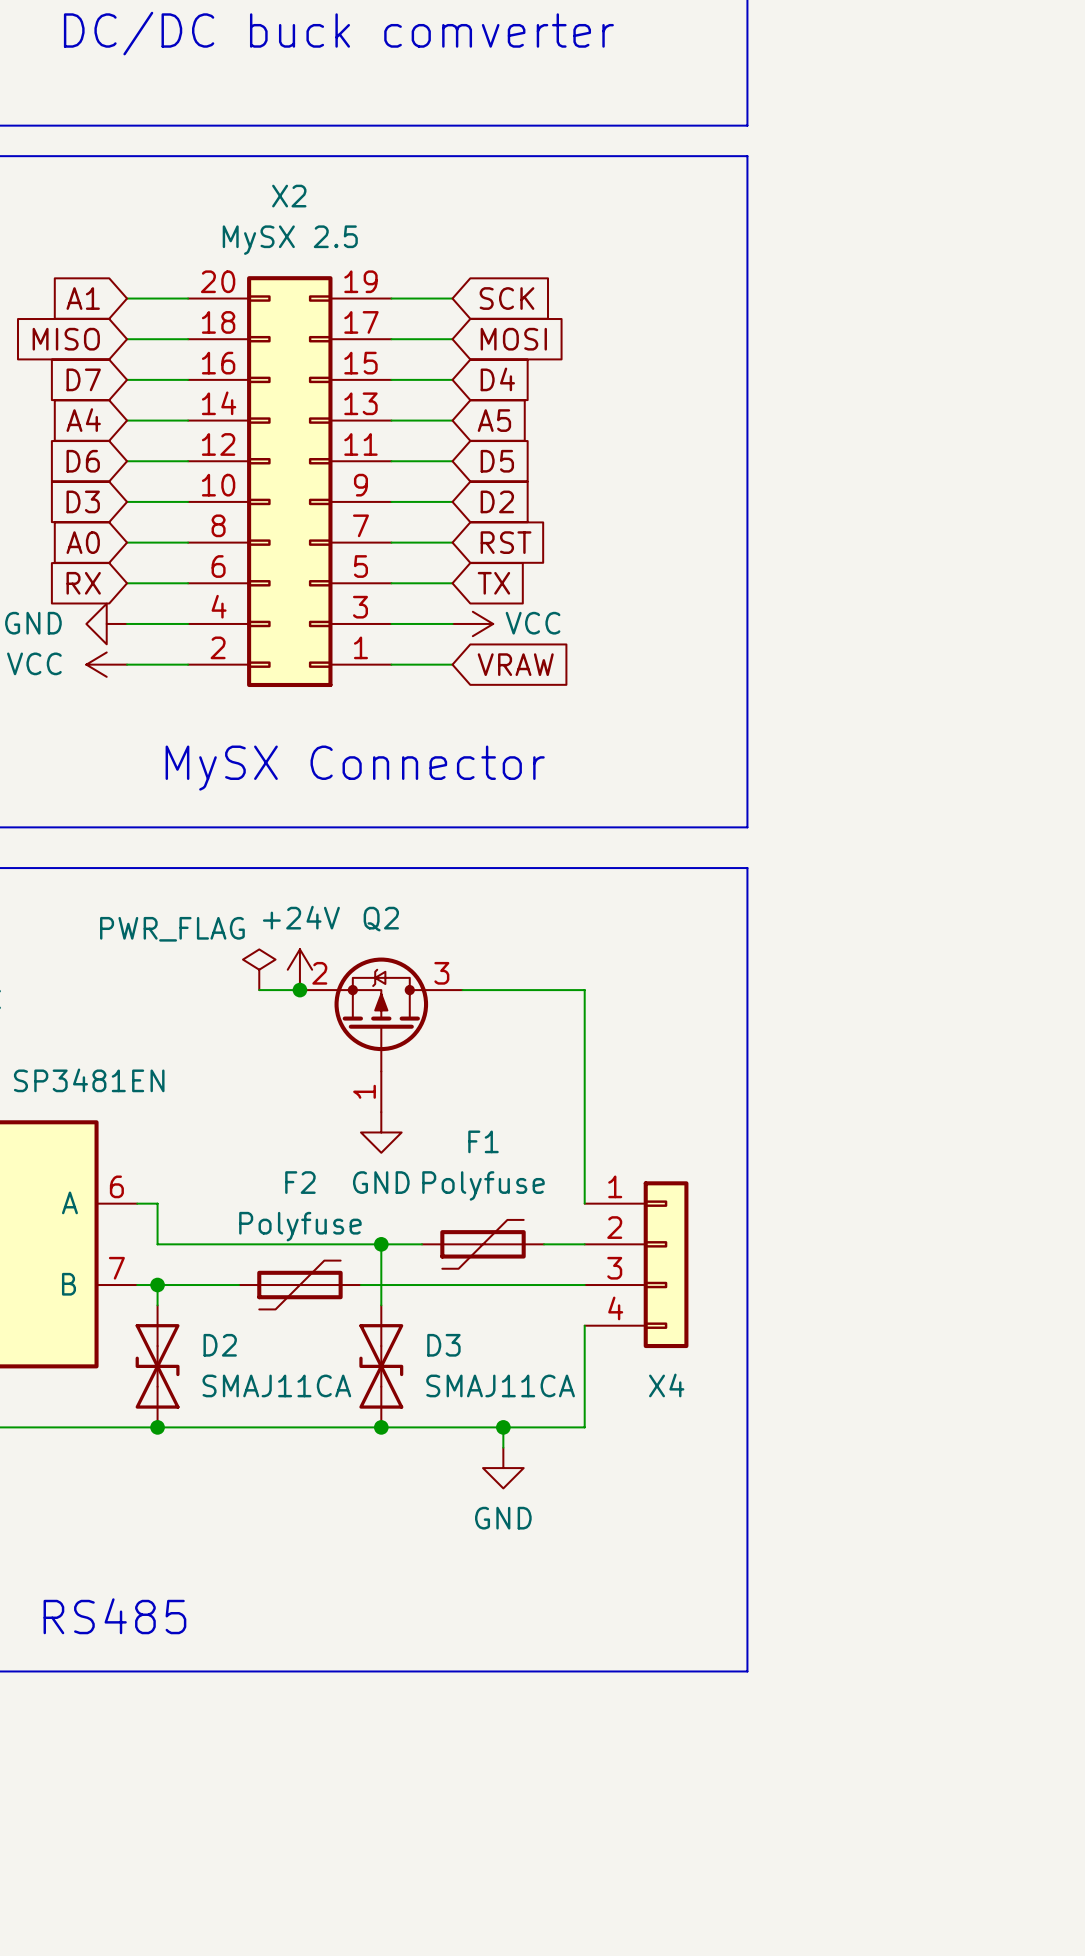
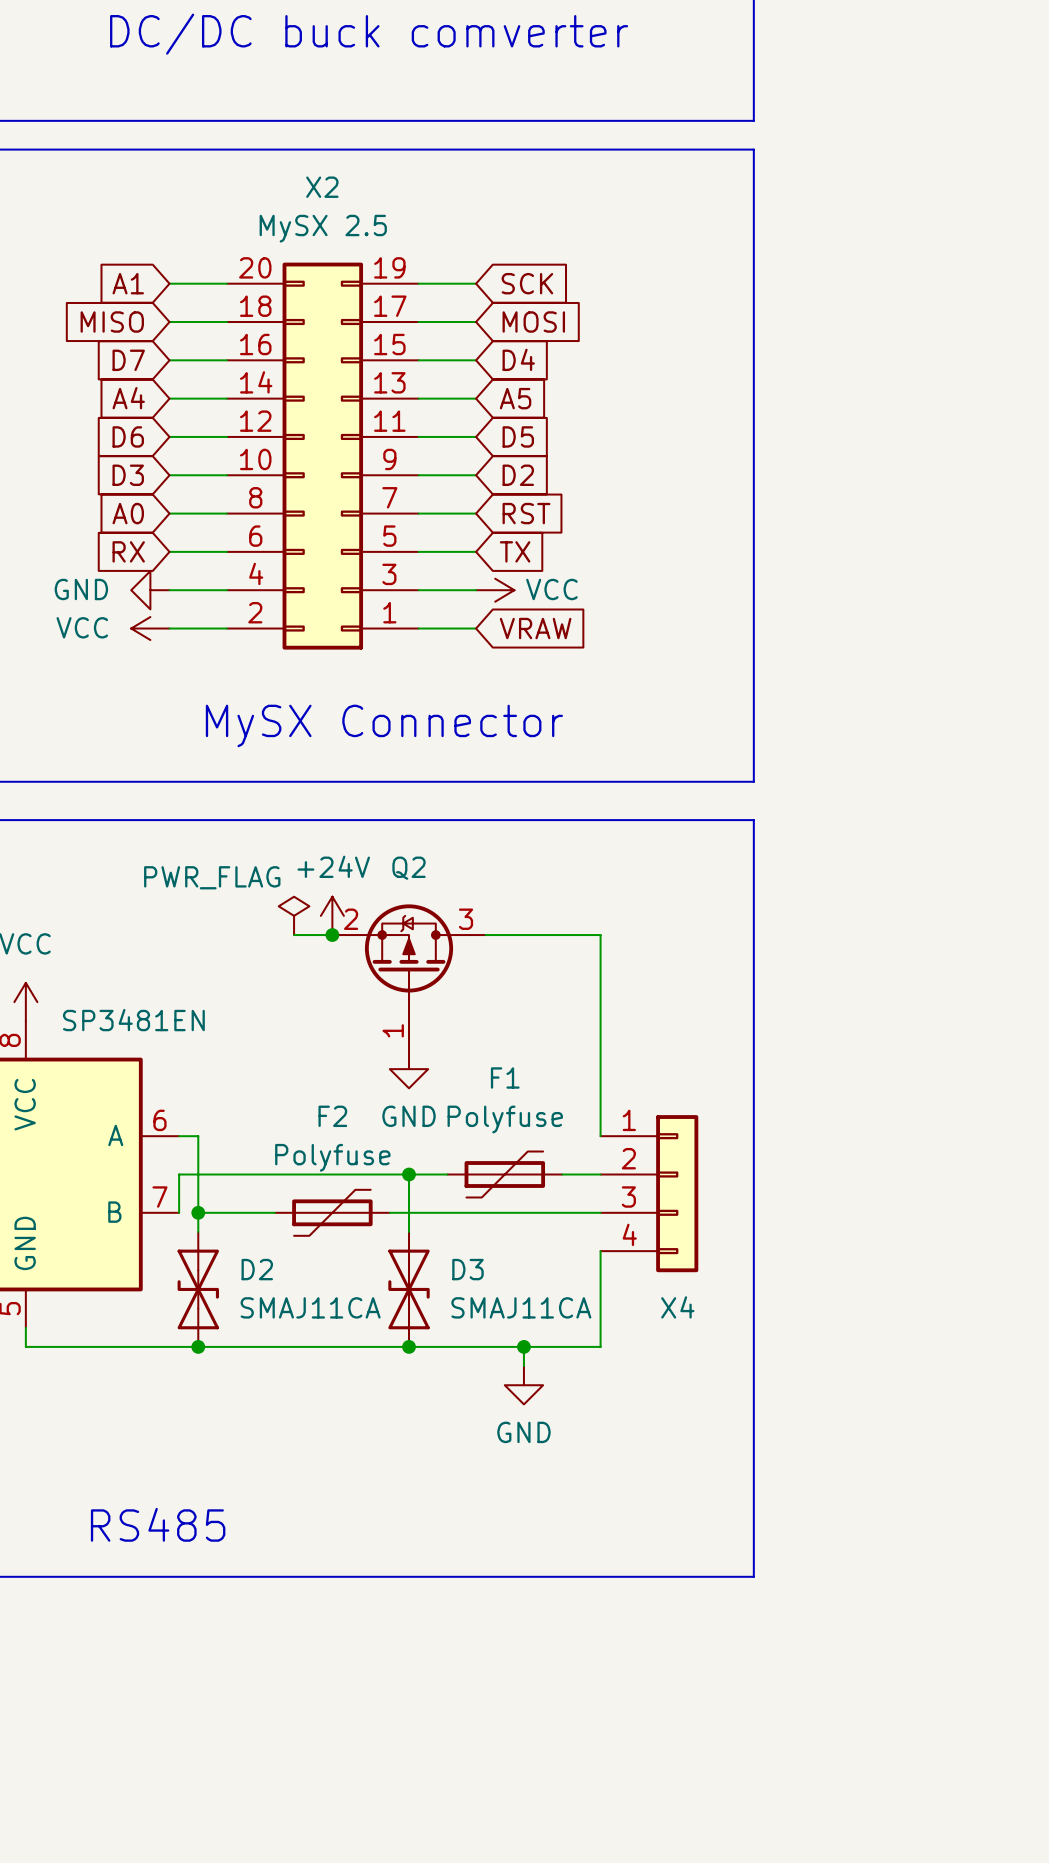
wire: (137, 1285) (157, 1285) -> (179, 1212) (179, 1174) (198, 1174) (198, 1212)

